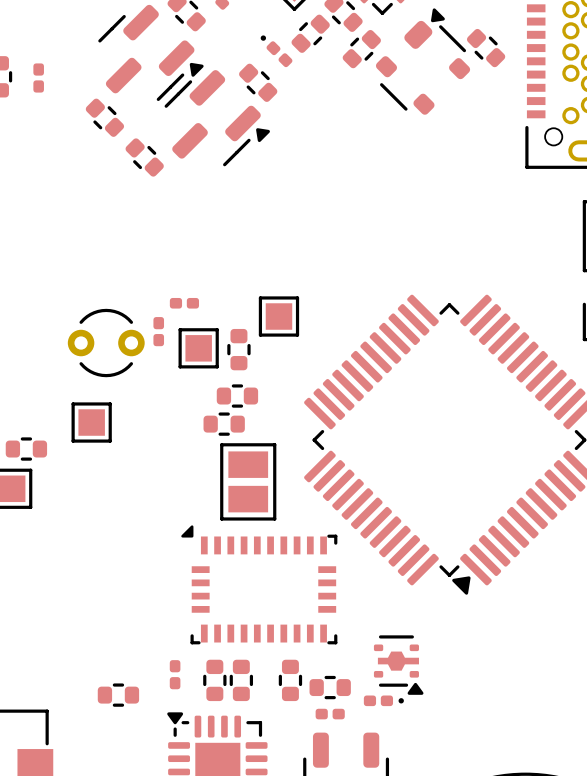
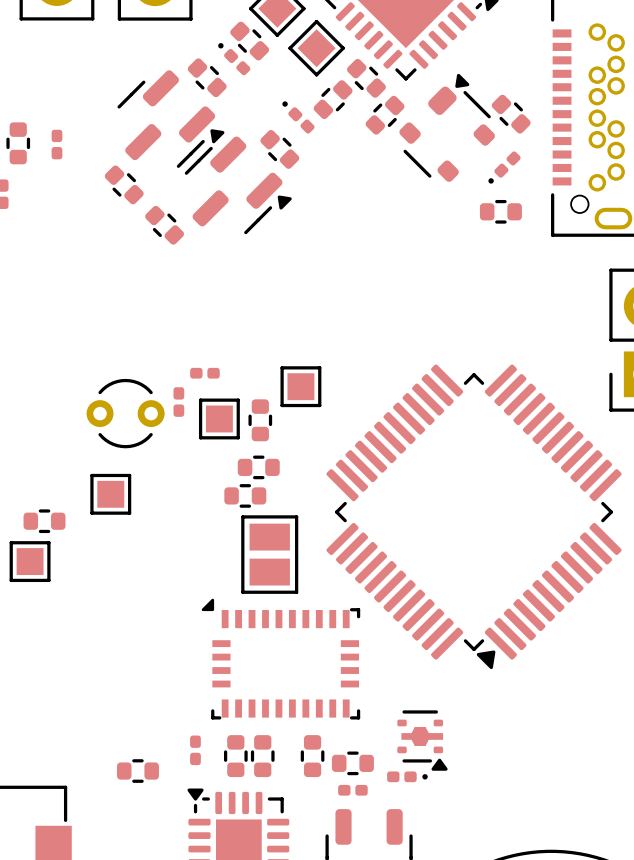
part: none -> (504, 167)
part: none -> (500, 211)

